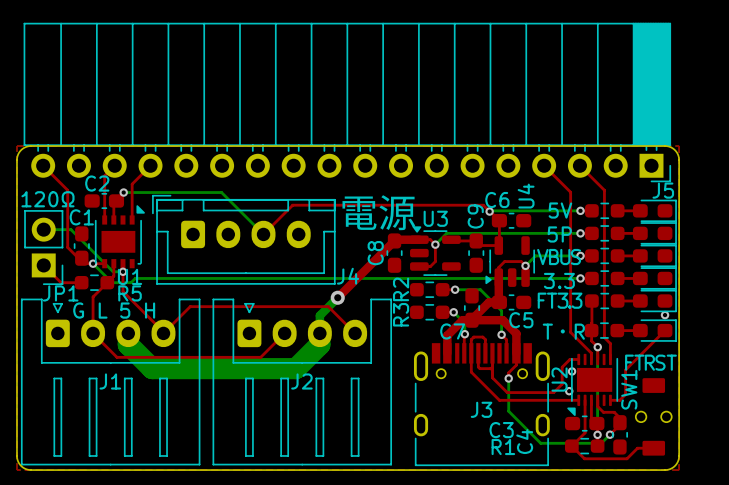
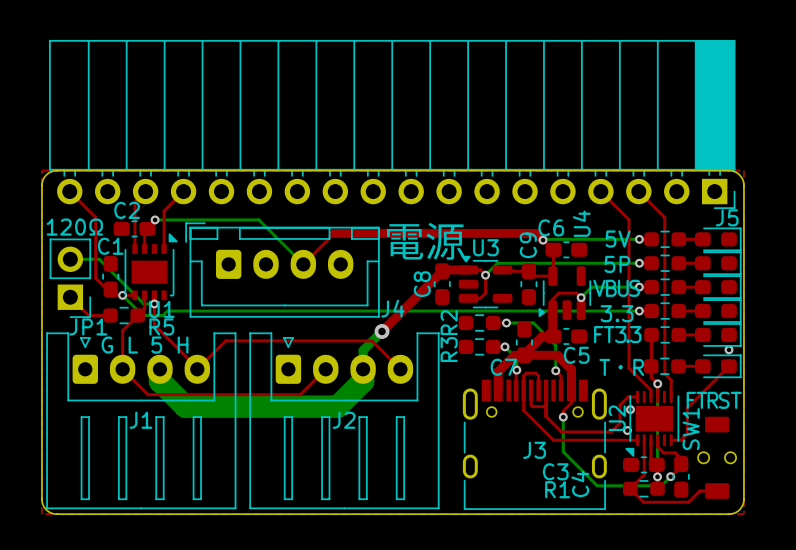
top track width: thin (292, 205) (483, 205) (489, 211) -> thick (334, 233) (536, 233) (543, 240)

